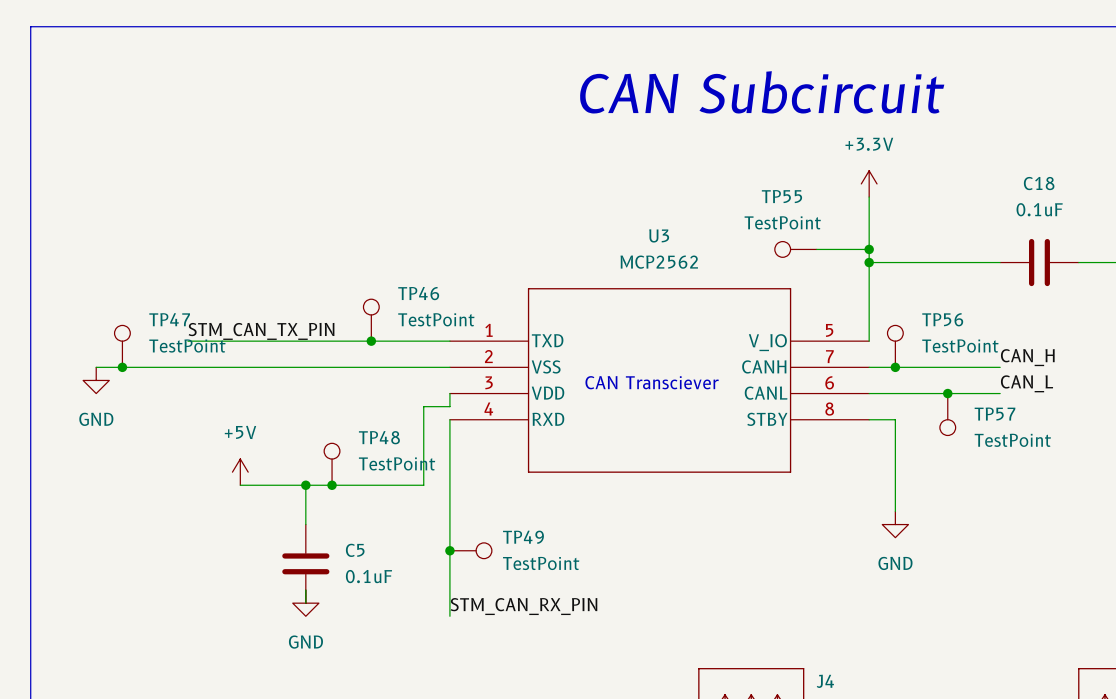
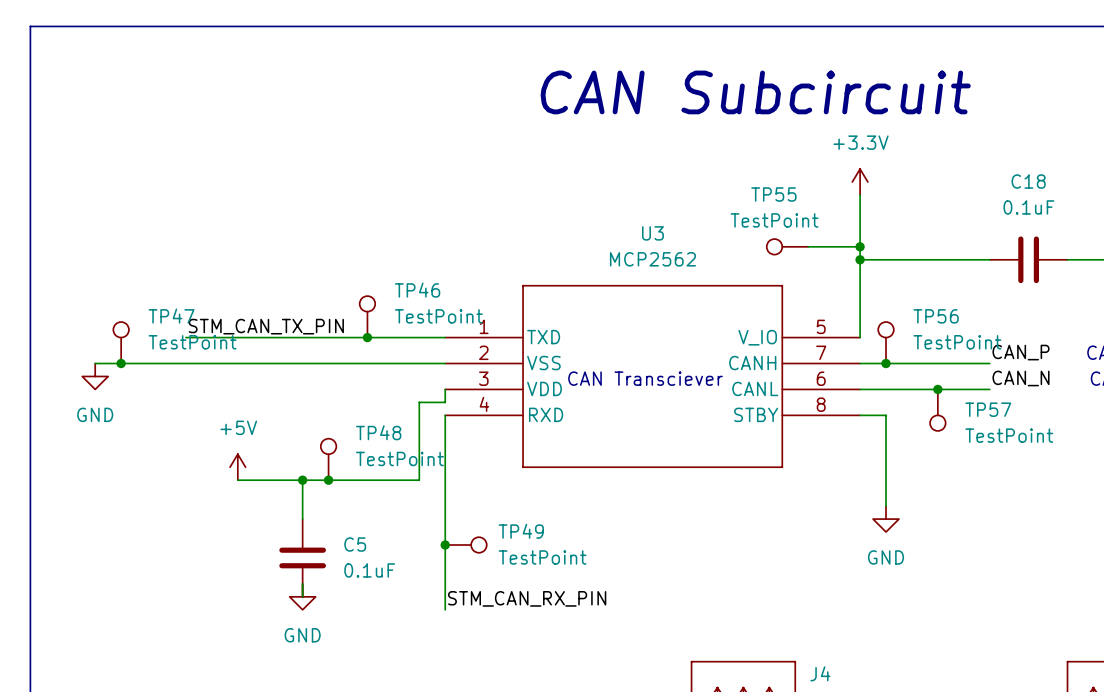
label: CAN_H (1027, 357) -> CAN_P (1020, 352)
label: CAN_L (1027, 383) -> CAN_N (1020, 378)

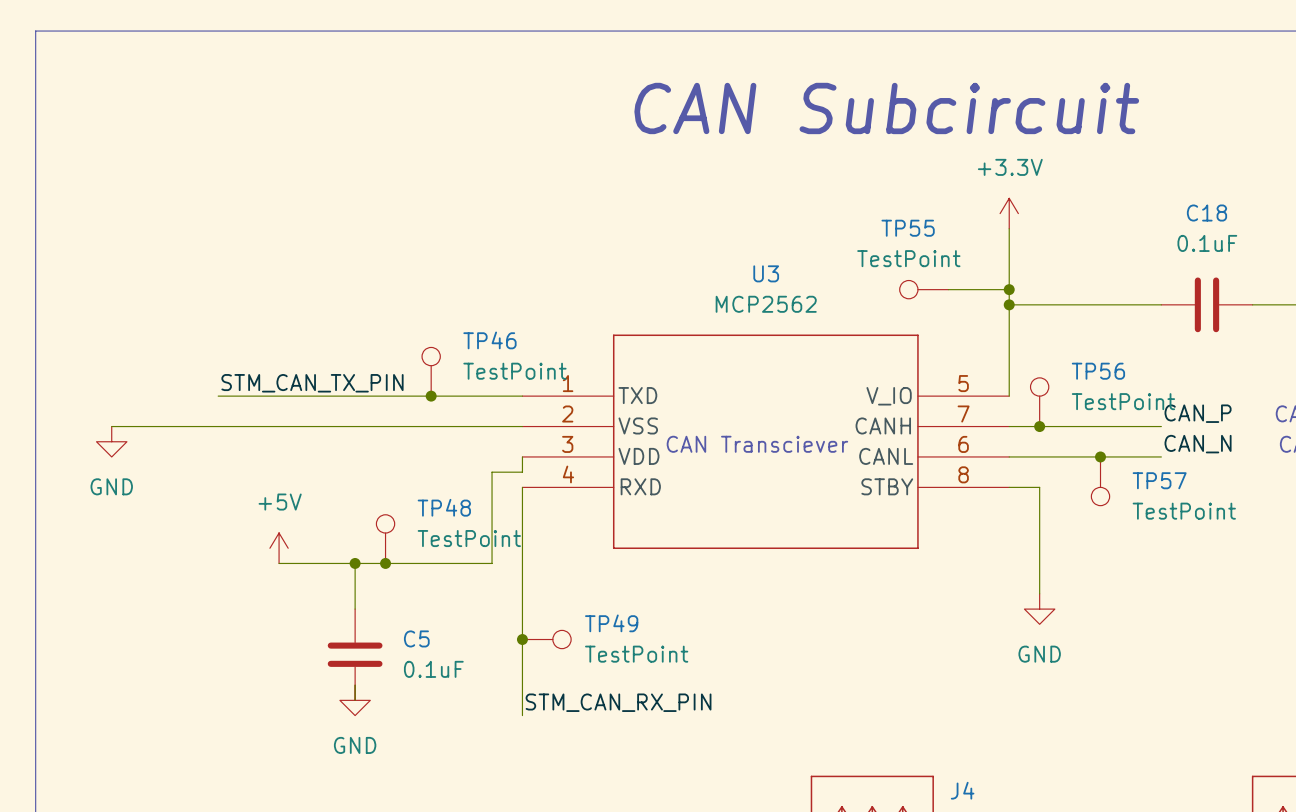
TP47: TestPoint (121, 342) -> none
junction: (121, 363) -> none

